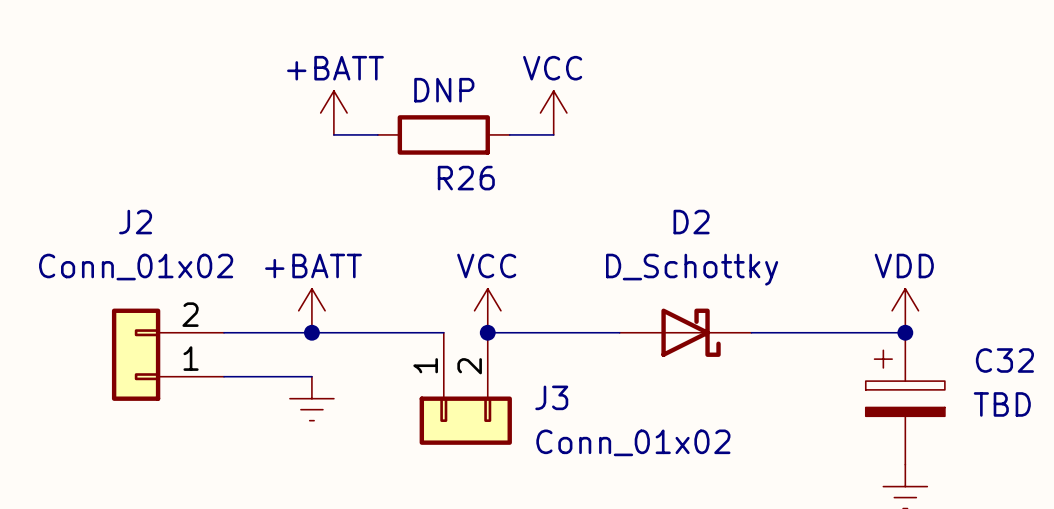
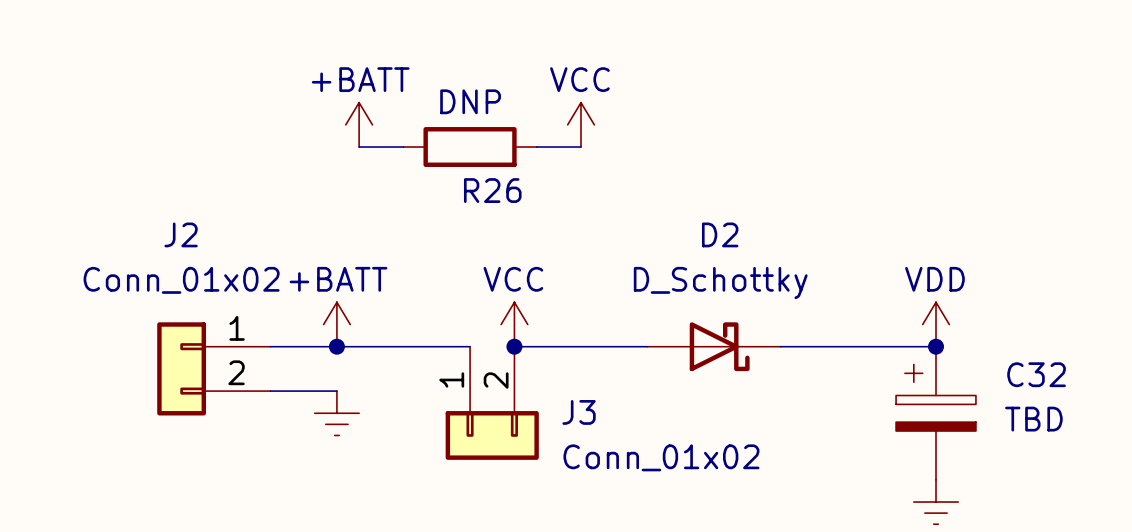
J2 flip: as is (136, 354) -> up-down (181, 368)

